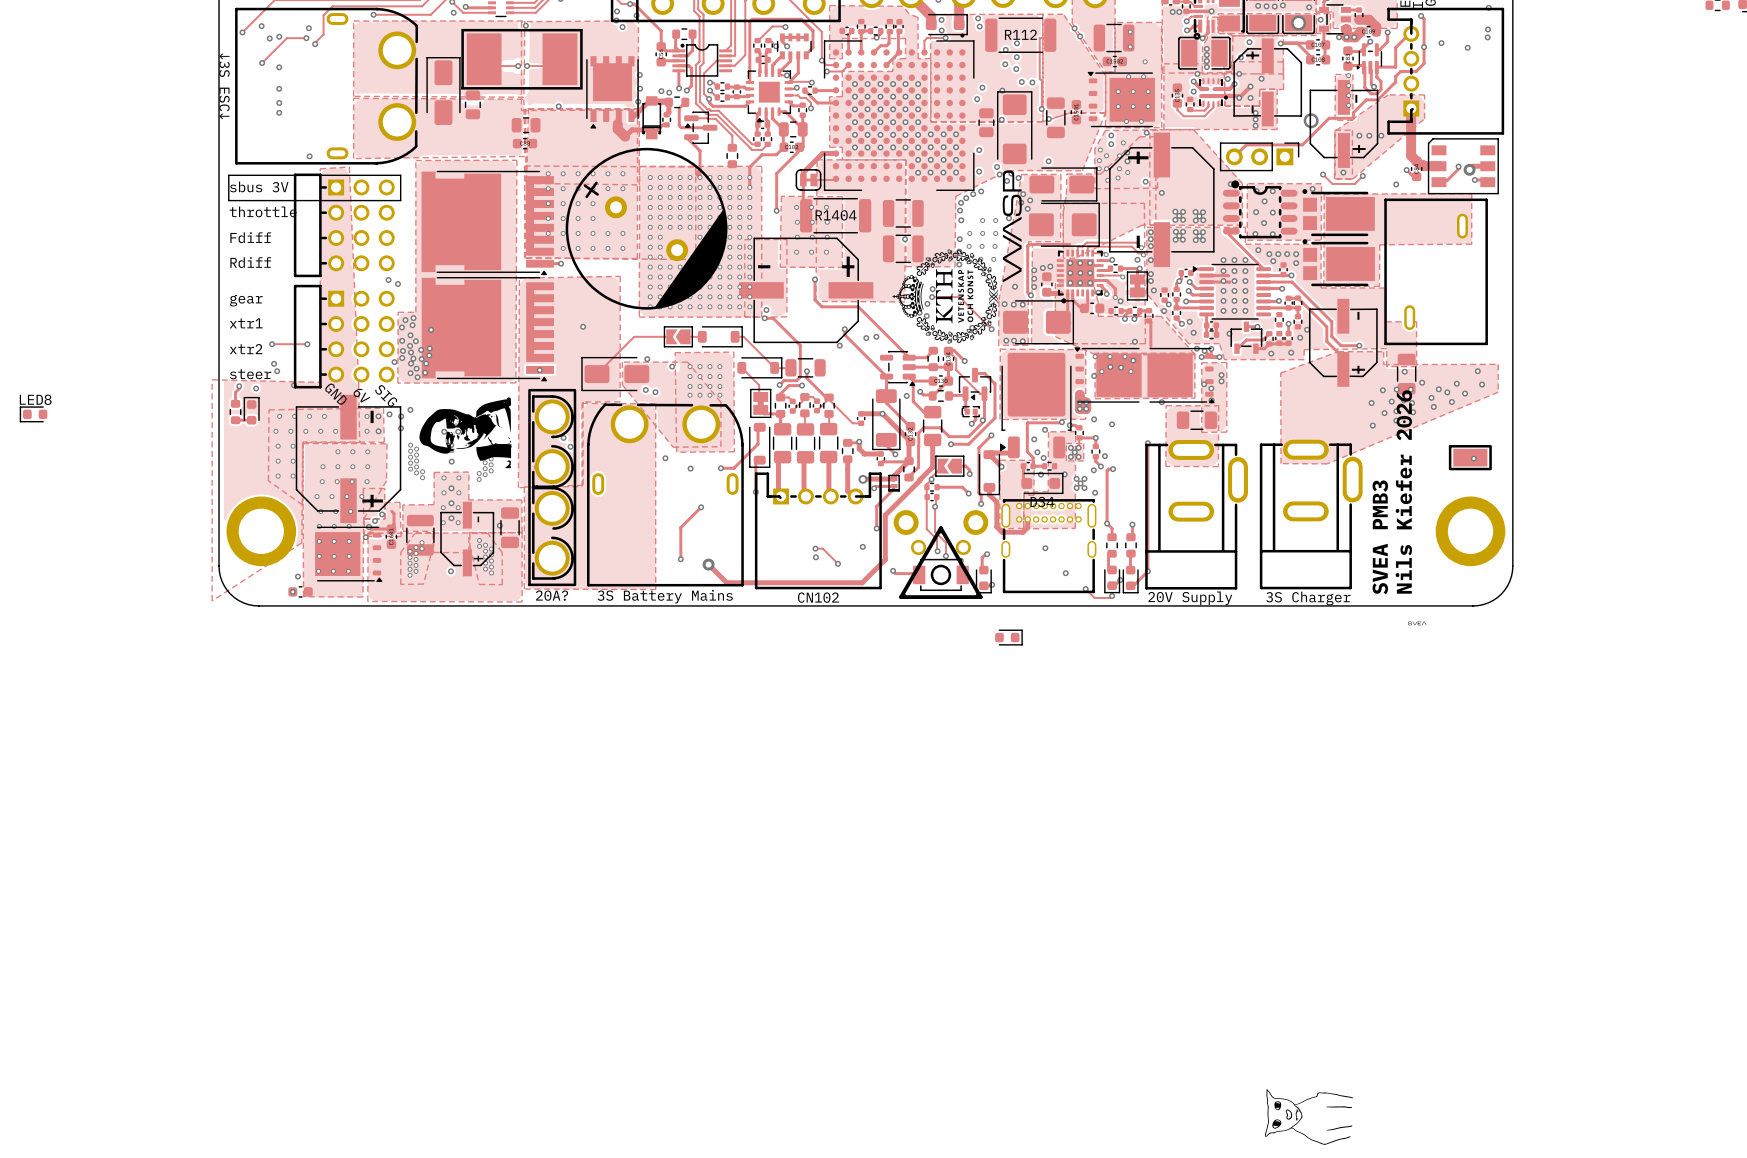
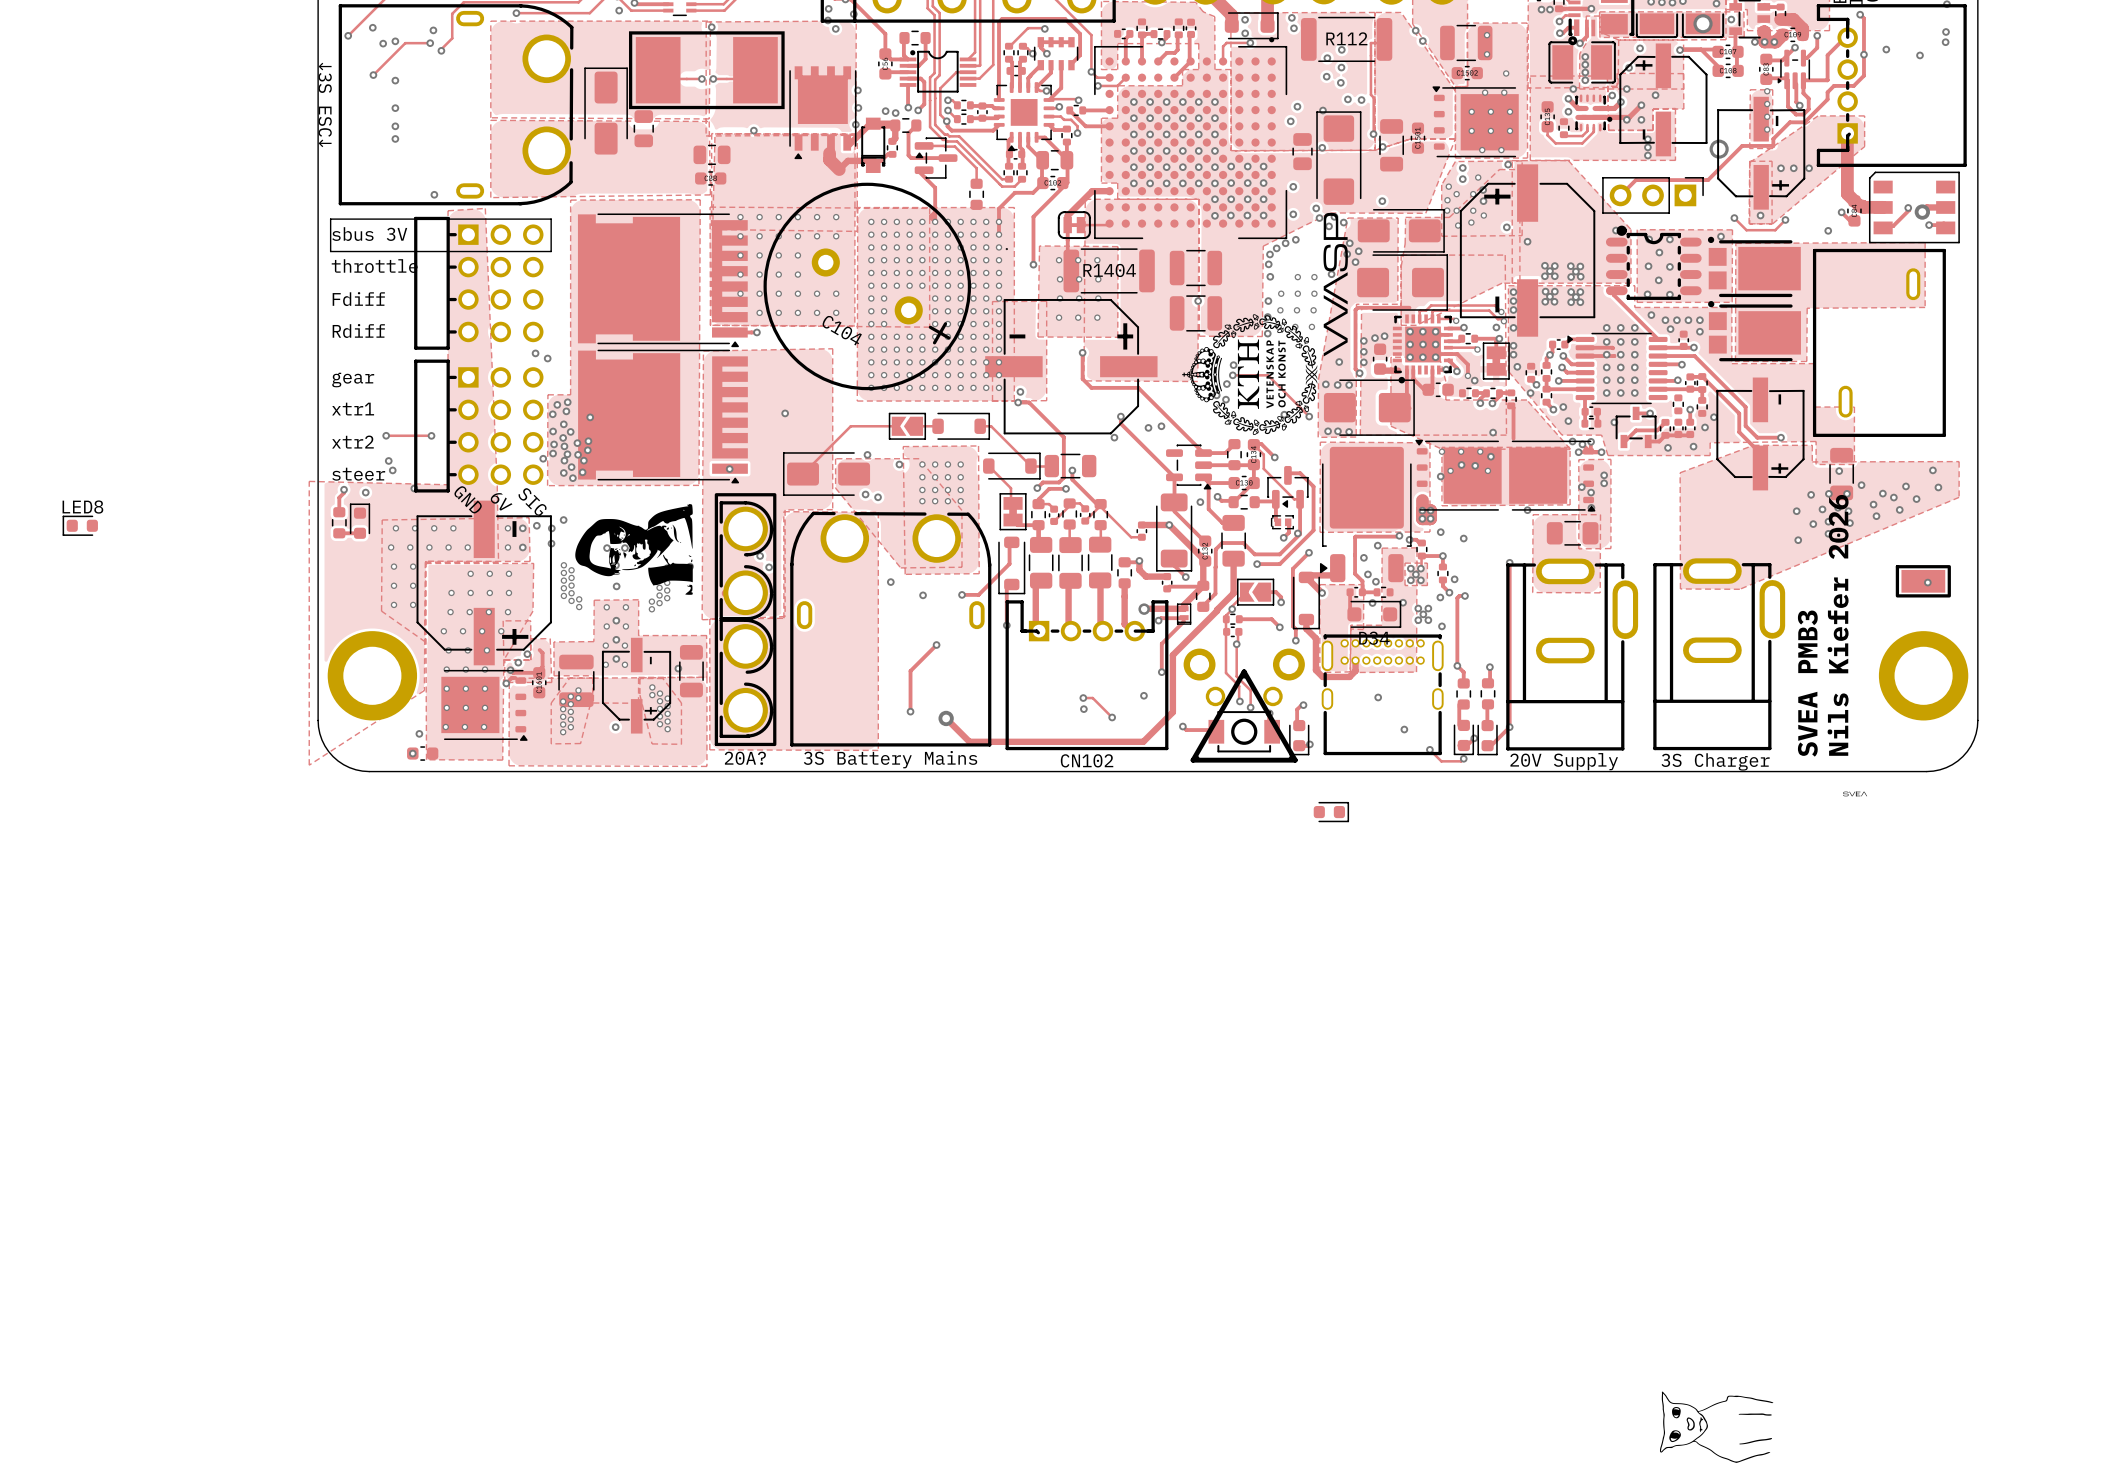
C104: none -> (885, 286)
part: (646, 228) -> none

